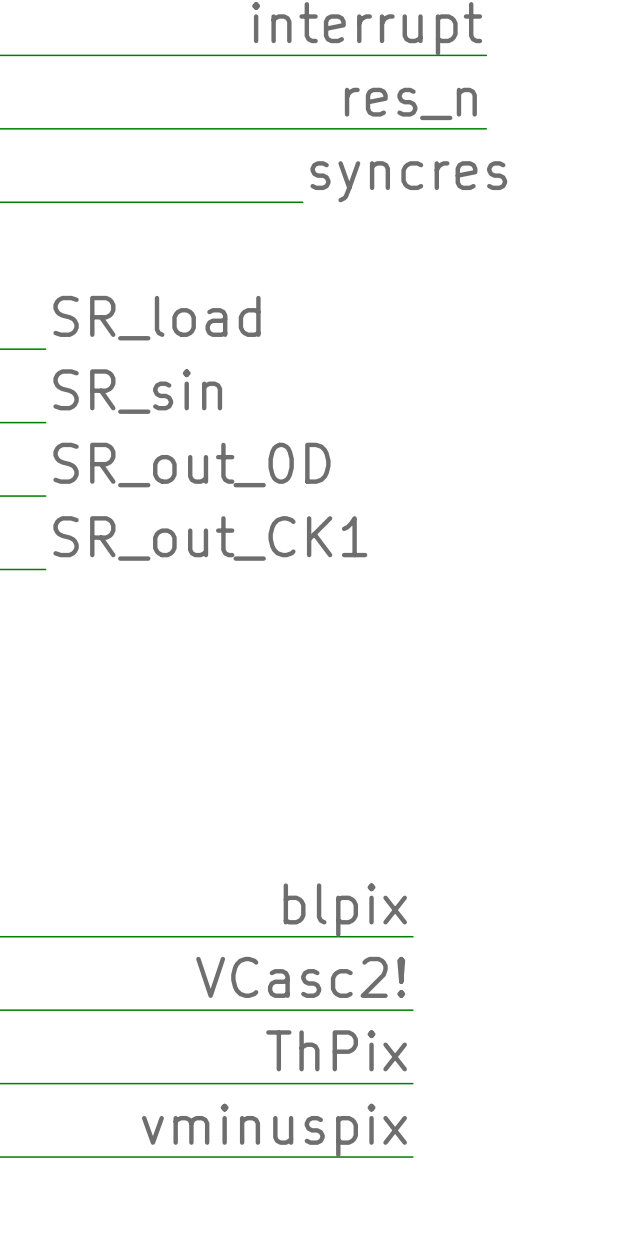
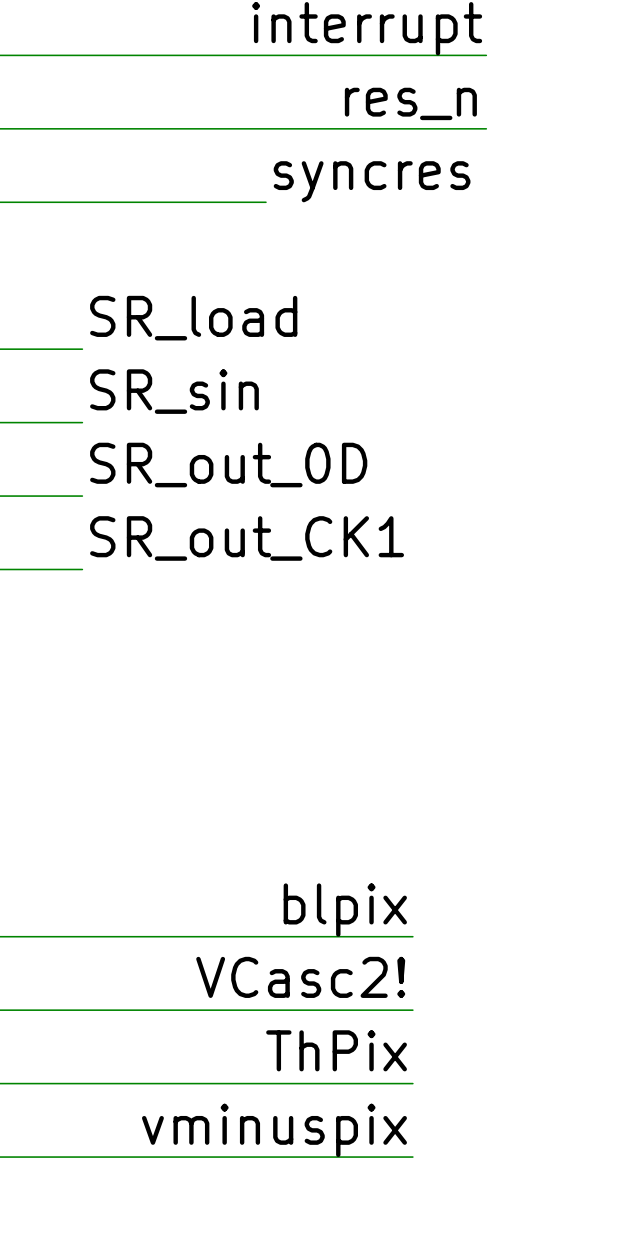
label position: syncres (408, 181) -> syncres (372, 181)
wire: (266, 202) (302, 202) -> (45, 349) (82, 349)
label position: SR_load (156, 318) -> SR_load (193, 318)
label position: SR_sin (137, 391) -> SR_sin (174, 391)
wire: none -> (45, 422) (82, 422)
label position: SR_out_0D (191, 465) -> SR_out_0D (228, 465)
wire: none -> (45, 496) (82, 496)
label position: SR_out_CK1 (210, 538) -> SR_out_CK1 (247, 538)
wire: none -> (45, 569) (82, 569)

